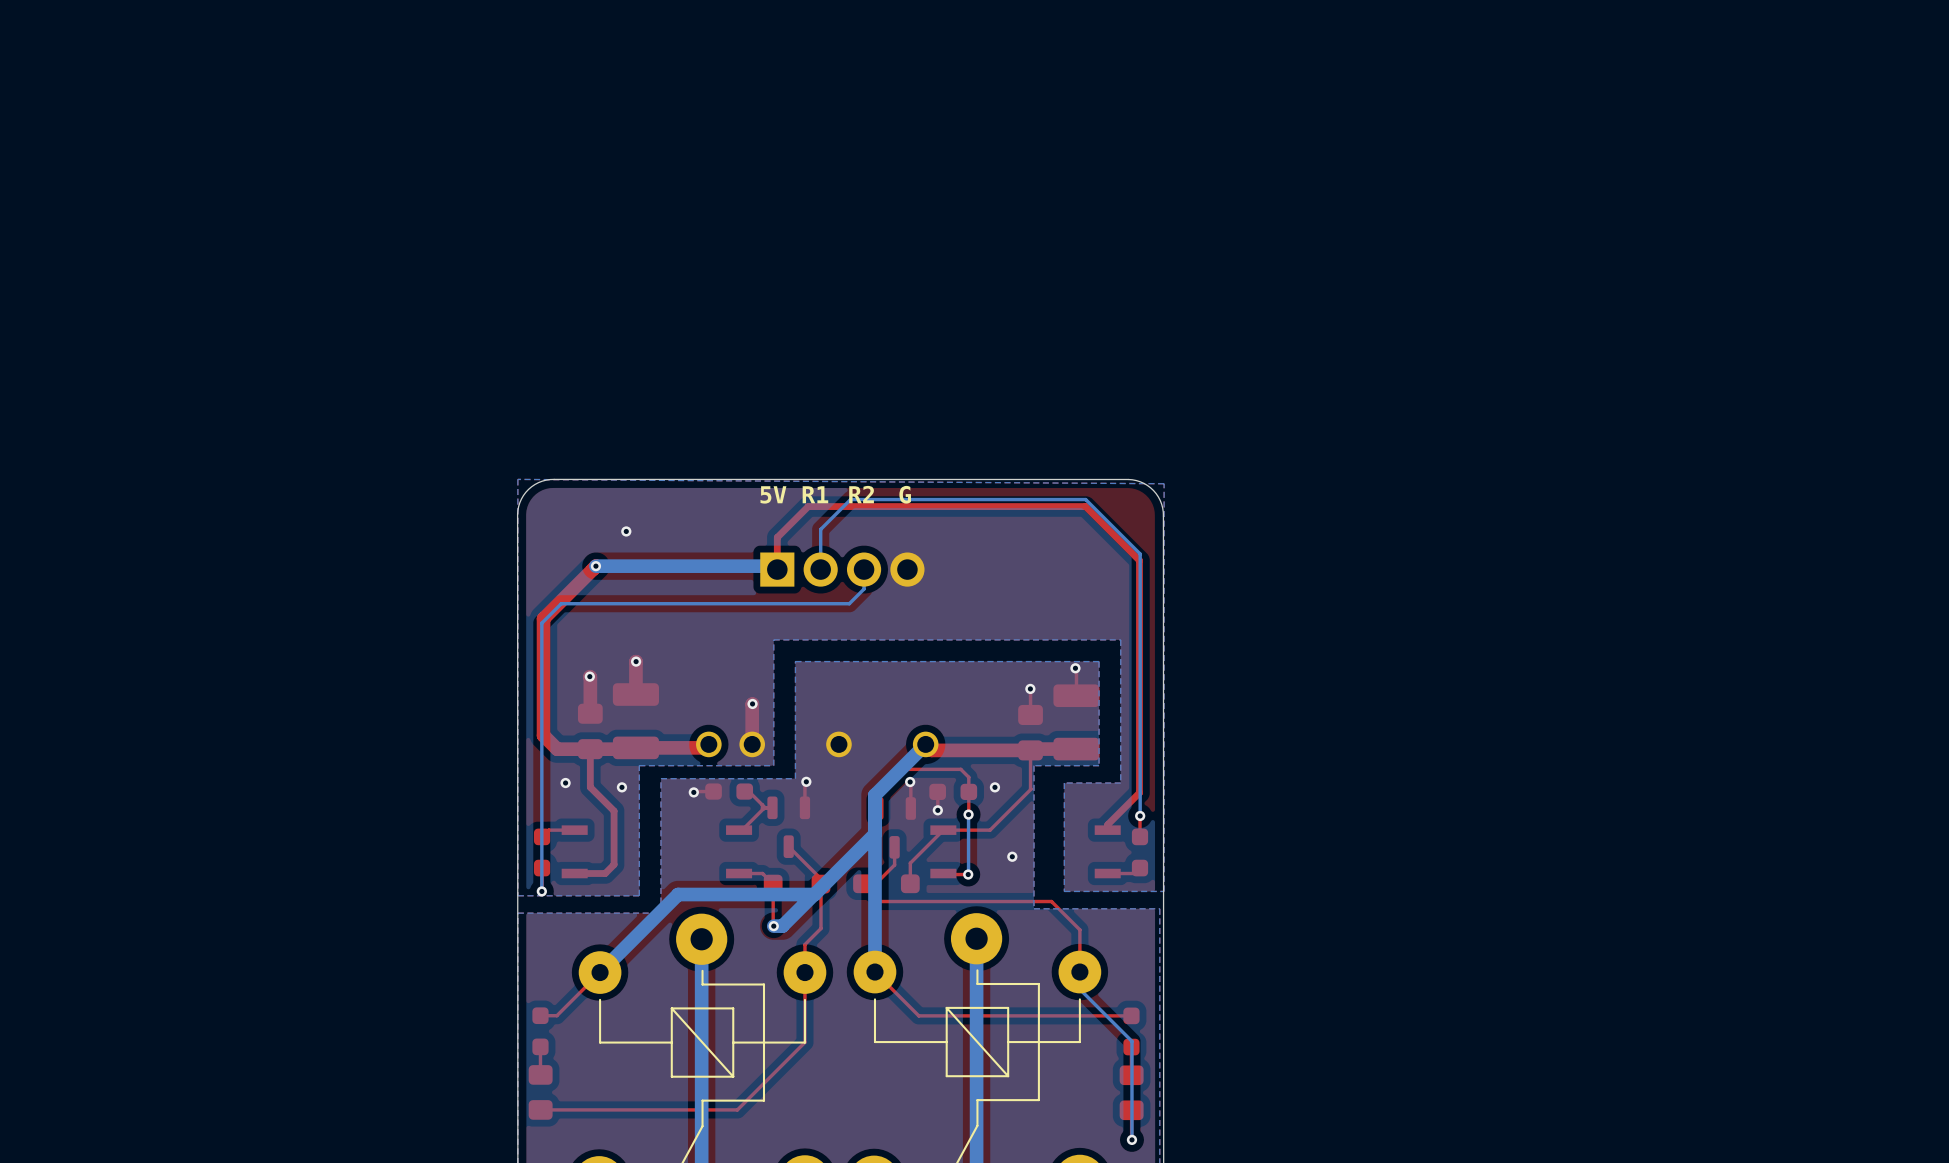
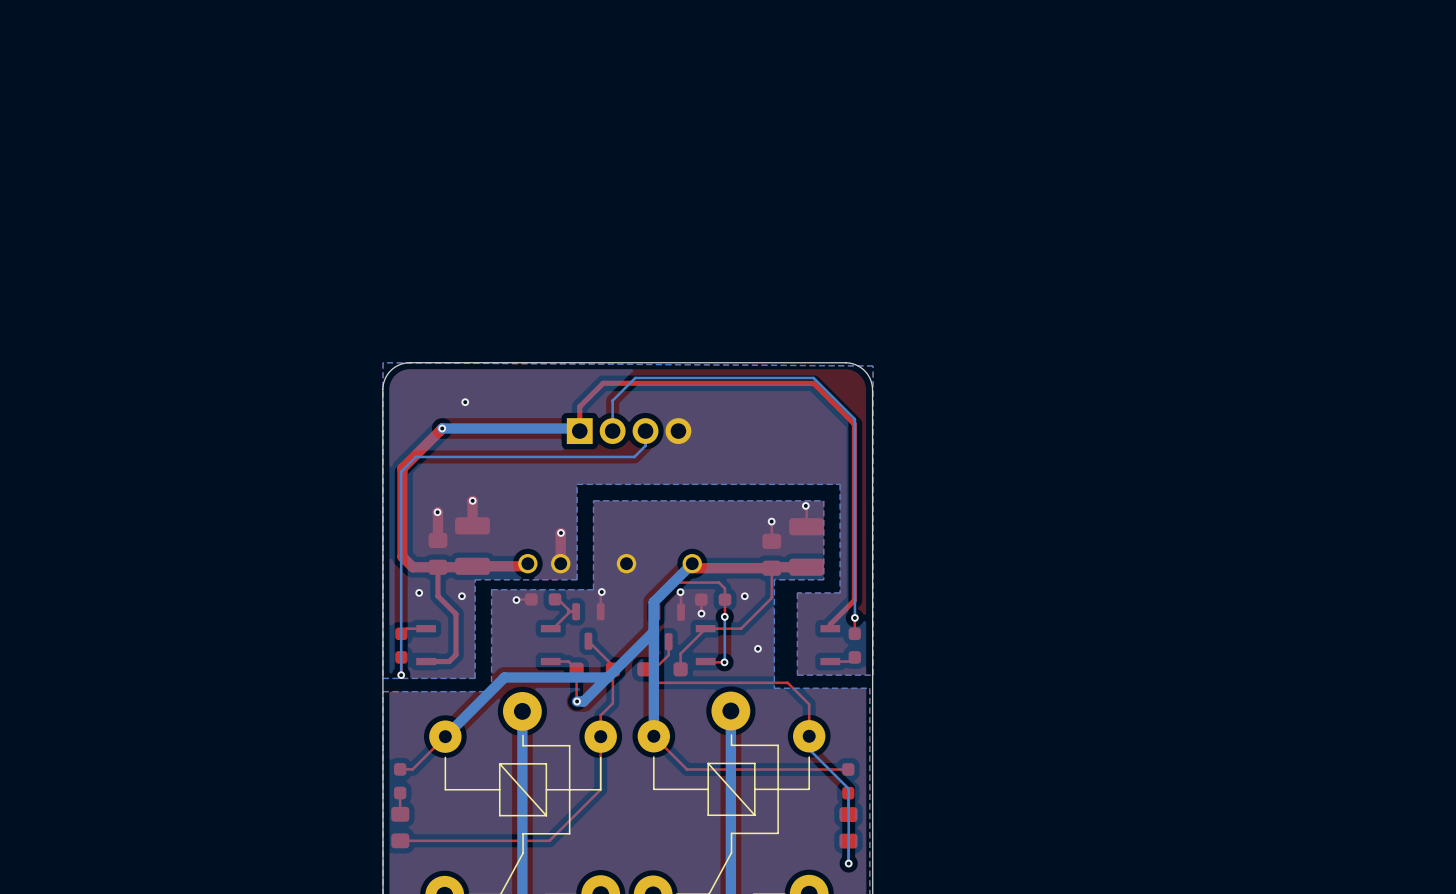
text: 5V (773, 494) -> none
text: R1 (815, 494) -> none
text: R2 (861, 494) -> none
text: G (905, 494) -> none

